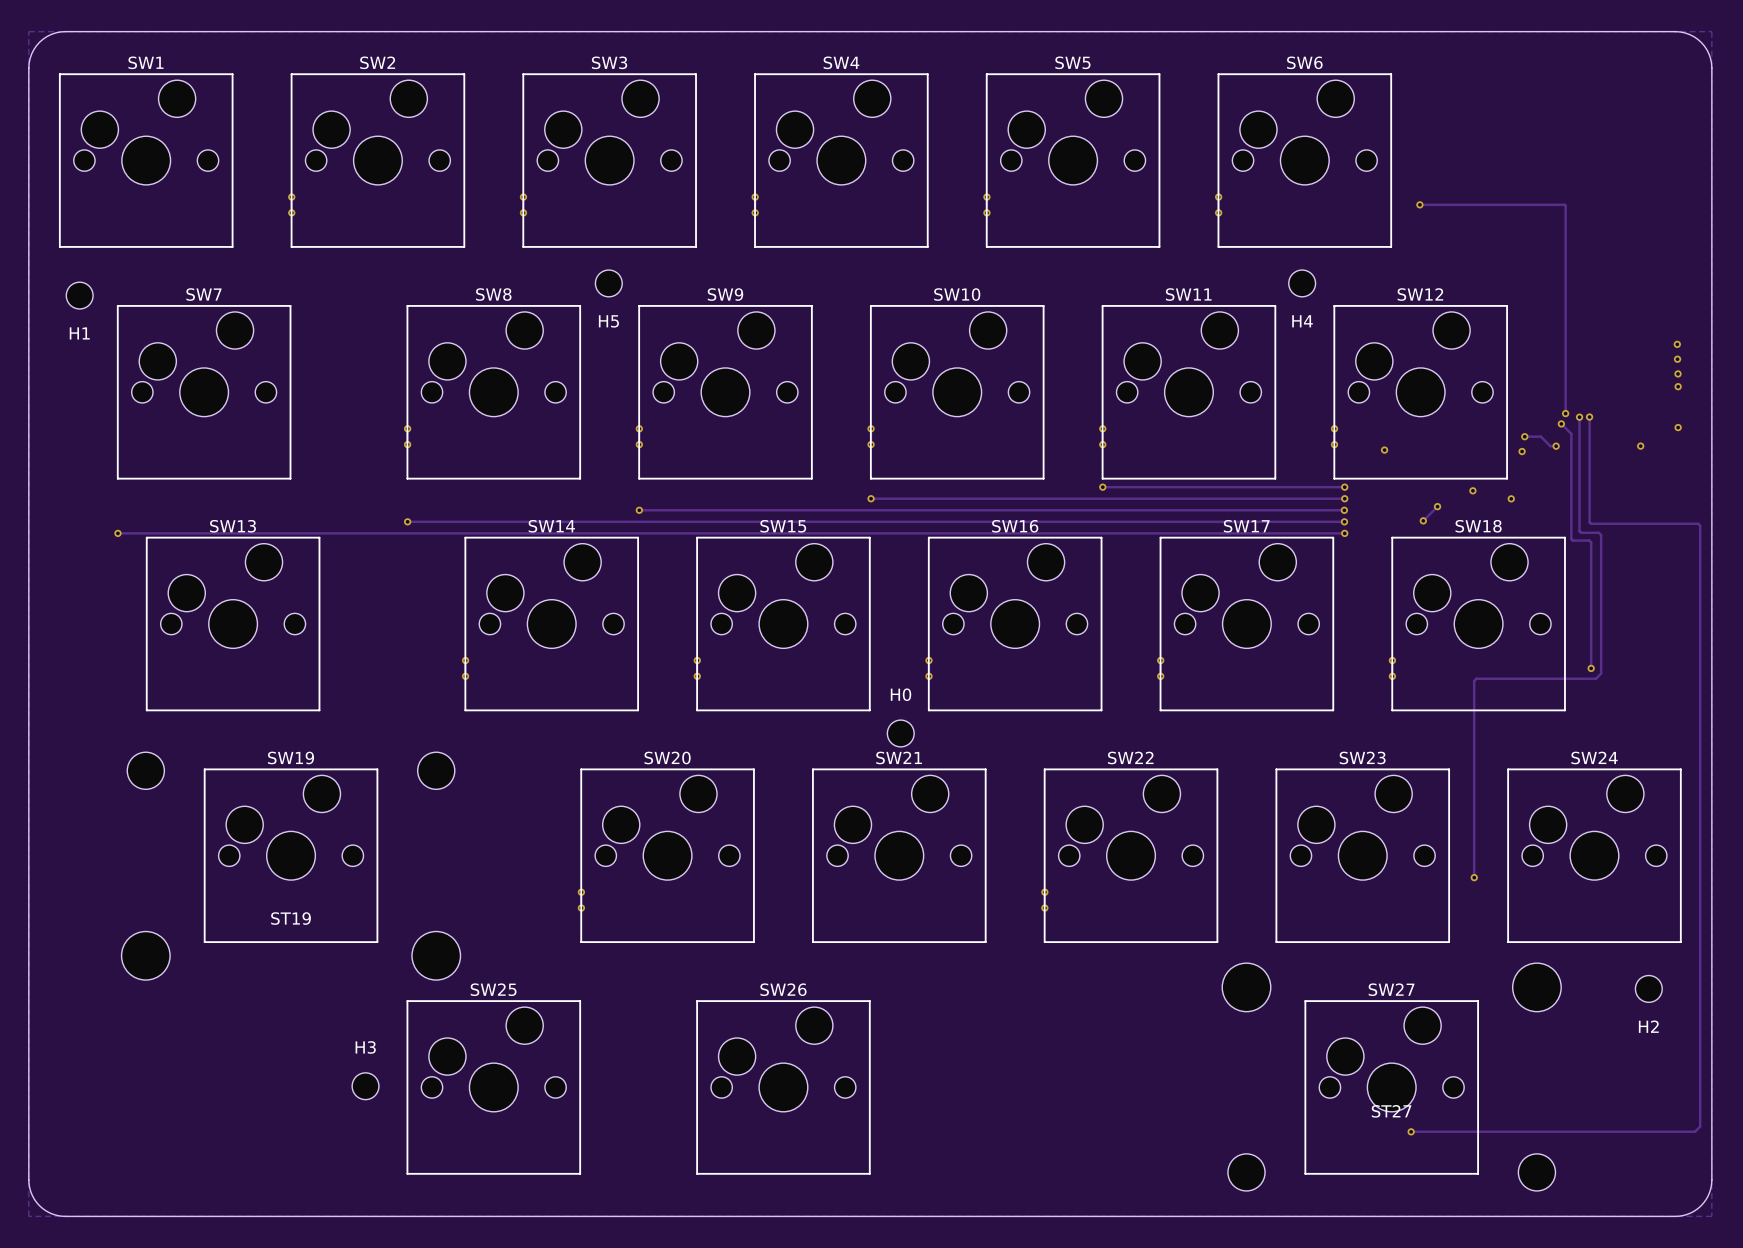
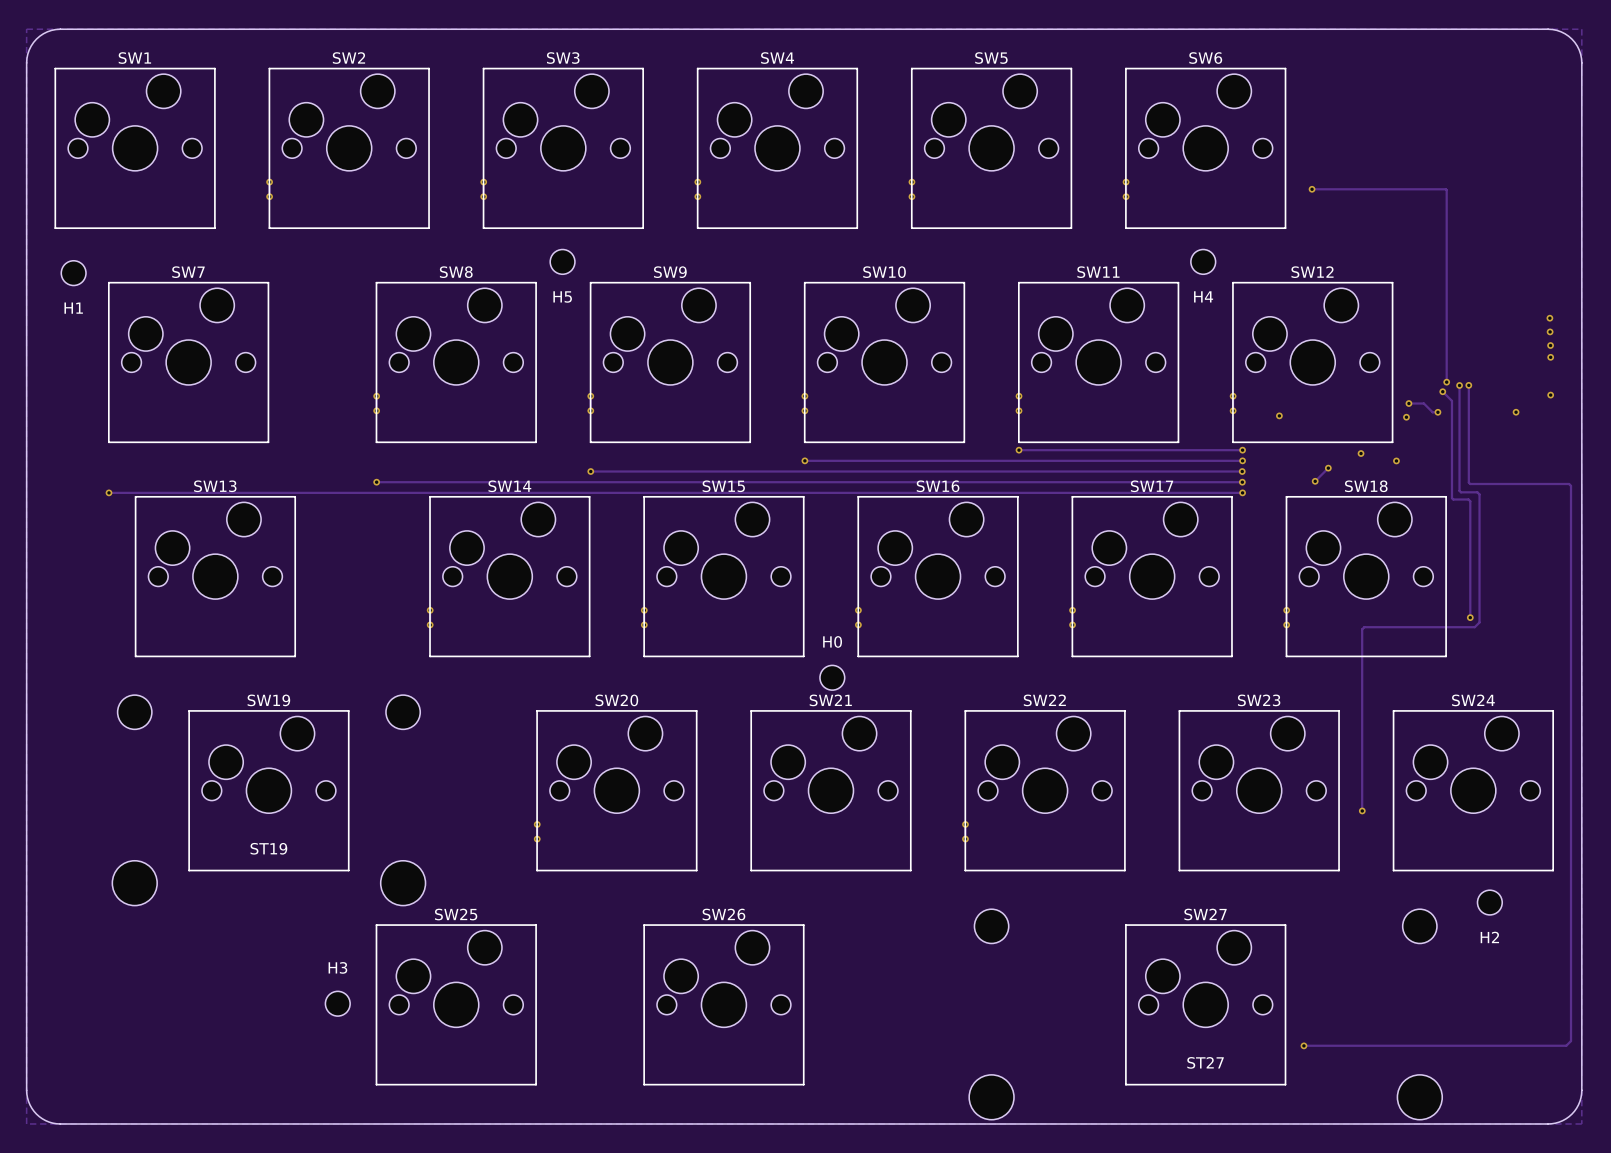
ST27 footprint: [1222, 963, 1562, 1191] -> [969, 909, 1443, 1120]
H2 position: (1648, 988) -> (1489, 902)
SW27 position: (1391, 1087) -> (1205, 1004)

